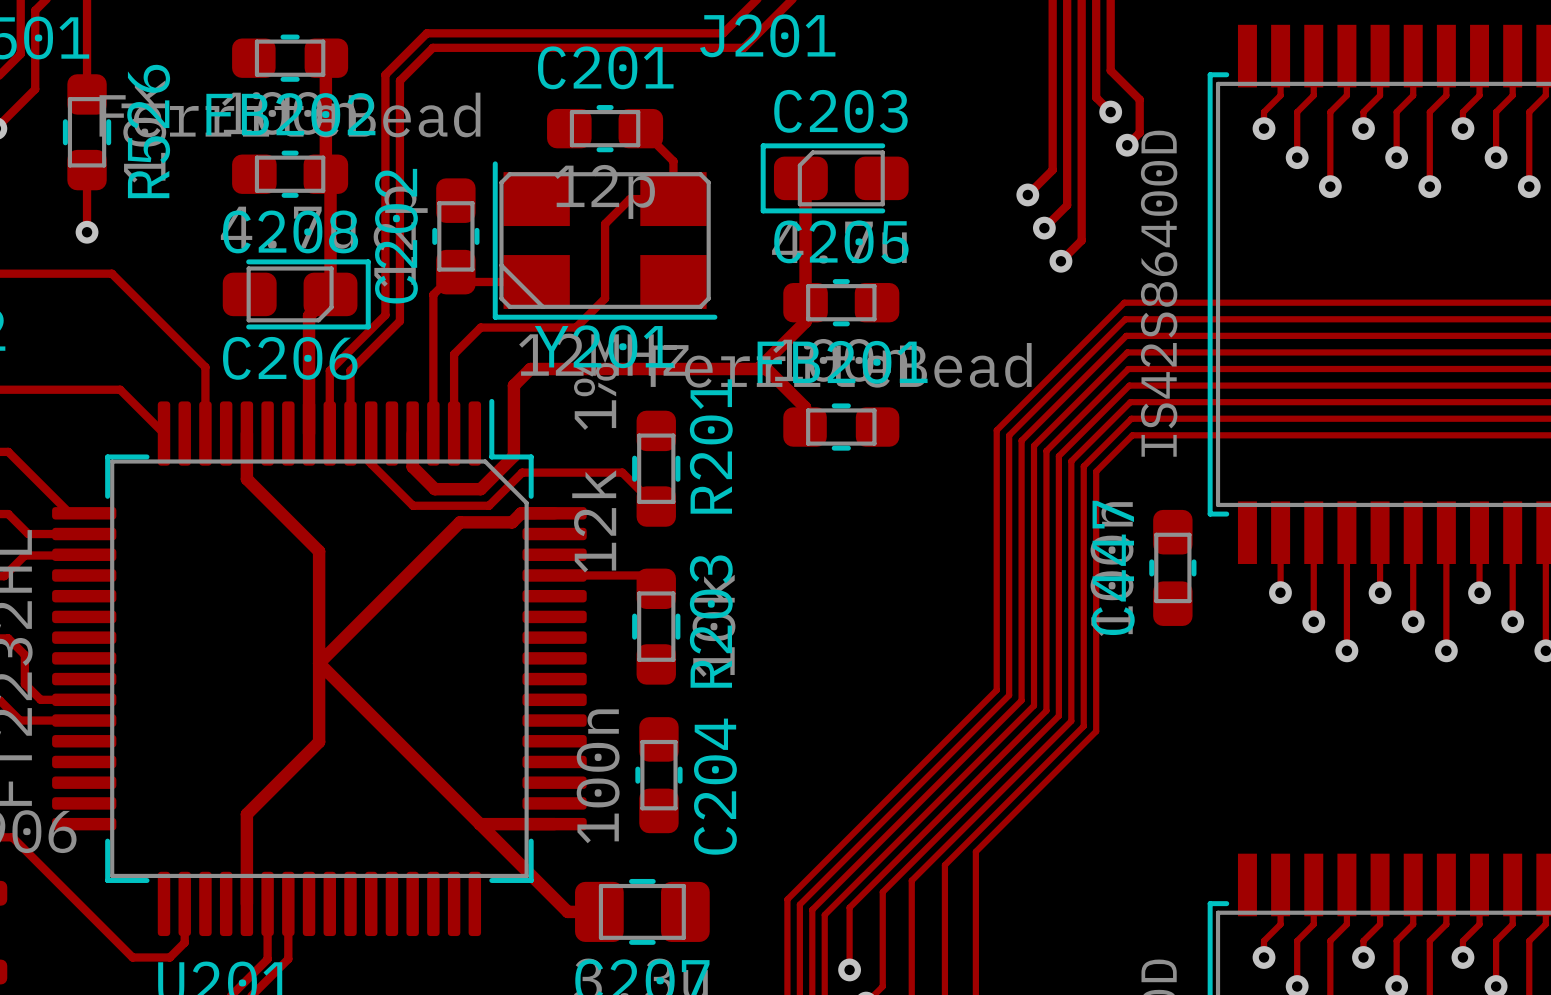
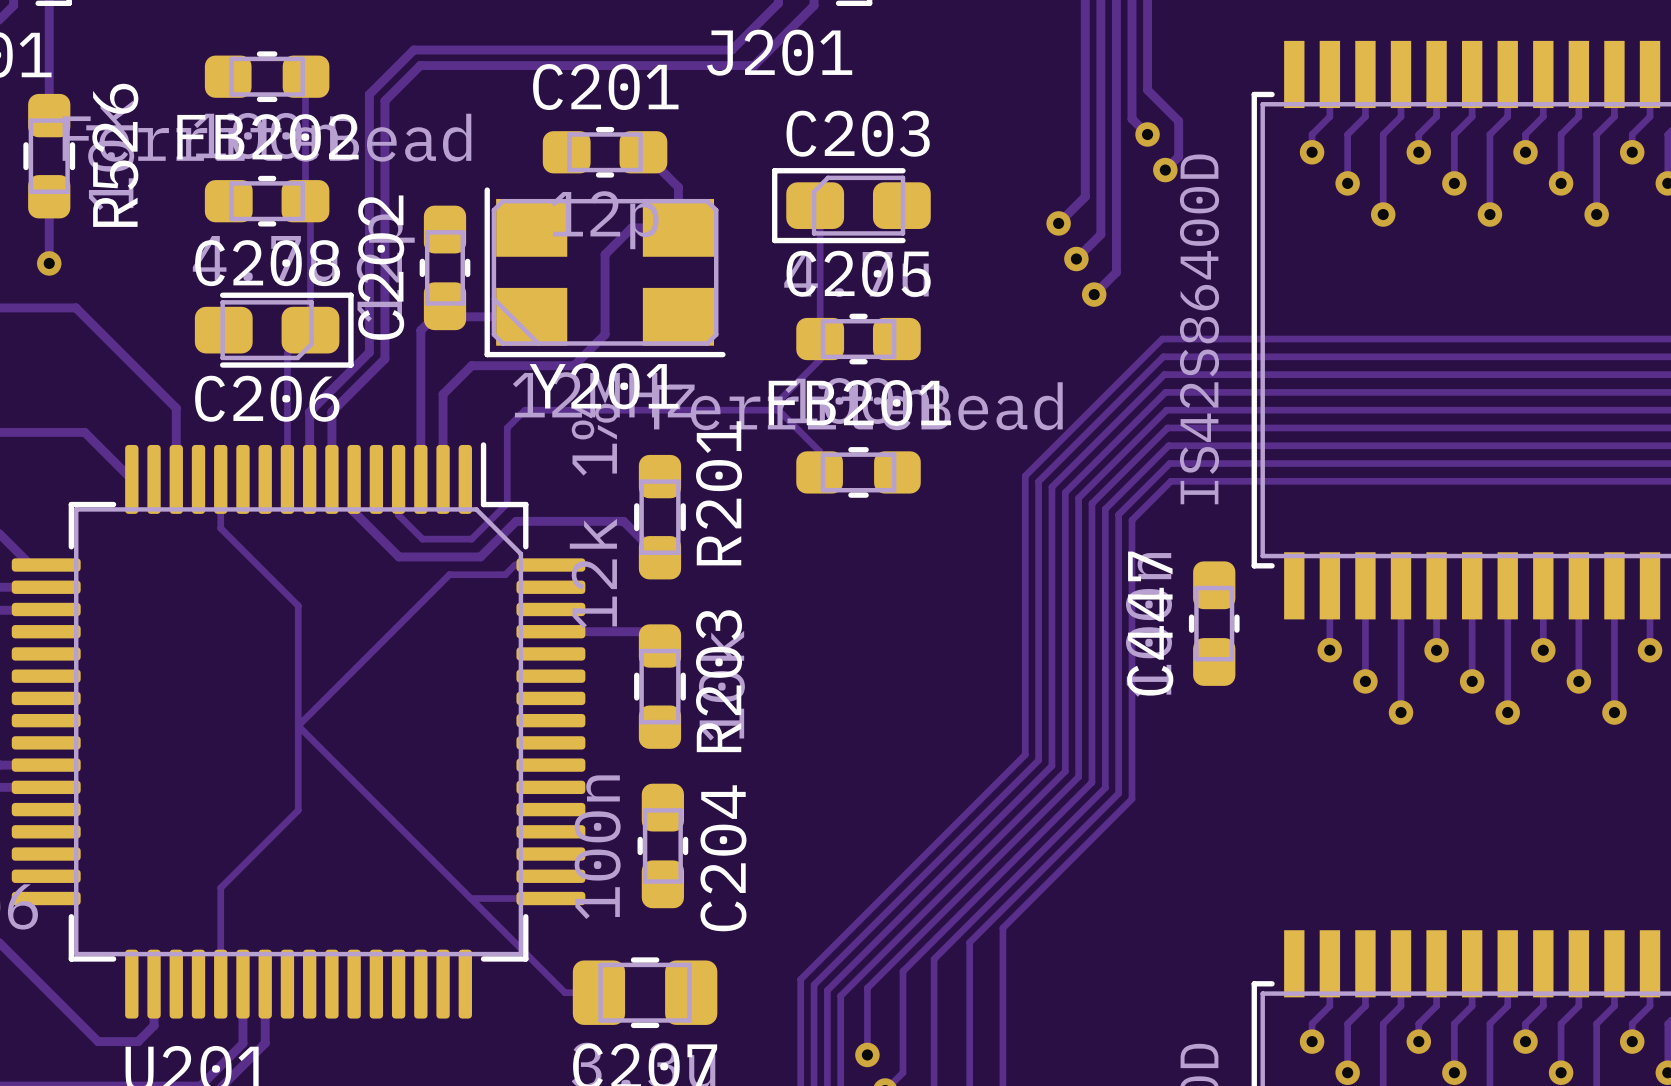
track width: thick (325, 58) (325, 174) -> thin (305, 77) (305, 201)
track width: thick (330, 178) (330, 294) (309, 315) (309, 433) -> thin (310, 206) (310, 330) (287, 353) (287, 479)
track width: thick (805, 183) (805, 321) (758, 369) -> thin (820, 210) (820, 359) (769, 410)
track width: thick (805, 427) (805, 407) (766, 369) (530, 369) (513, 385) (513, 456) (480, 489) (434, 489) (412, 466) (412, 433) -> thin (819, 472) (819, 451) (778, 410) (525, 410) (507, 427) (507, 503) (471, 539) (422, 539) (398, 515) (398, 479)
track width: thick (246, 433) (246, 479) (319, 551) (319, 742) (246, 814) (246, 903) -> thin (220, 479) (220, 528) (298, 605) (298, 810) (220, 887) (220, 984)
track width: thick (554, 513) (521, 513) (512, 522) (460, 522) (319, 663) (567, 911) (599, 911) -> thin (550, 565) (515, 565) (505, 574) (449, 574) (298, 725) (565, 992) (598, 992)
track width: thick (480, 824) (554, 824) -> thin (470, 898) (550, 898)

